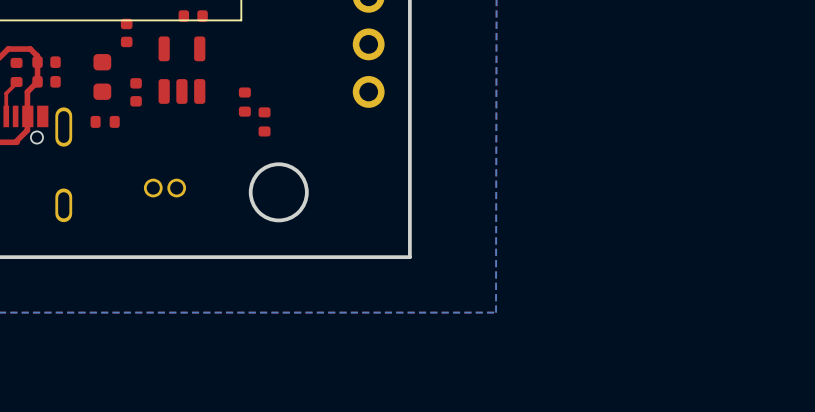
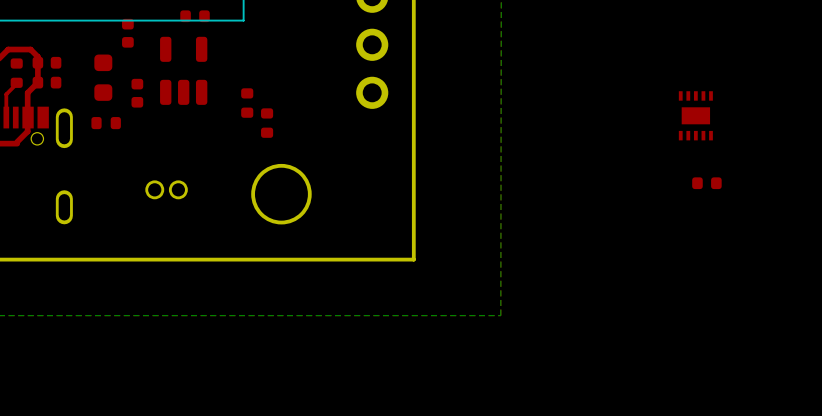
part: none -> (695, 115)
part: none -> (706, 183)

